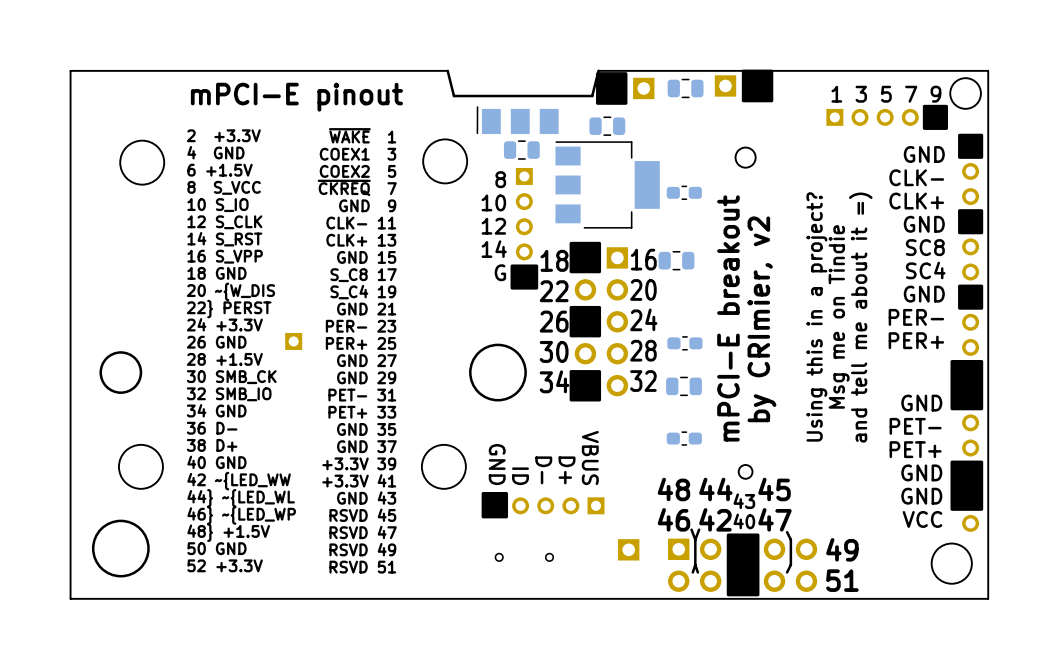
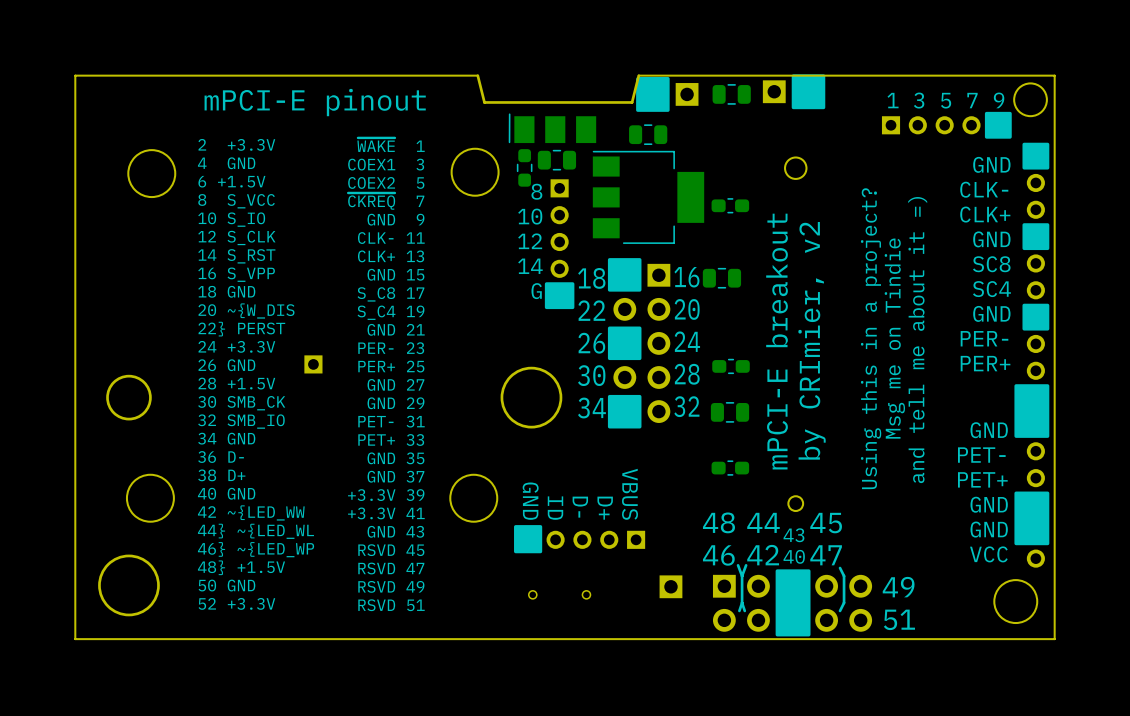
part: none -> (524, 167)

